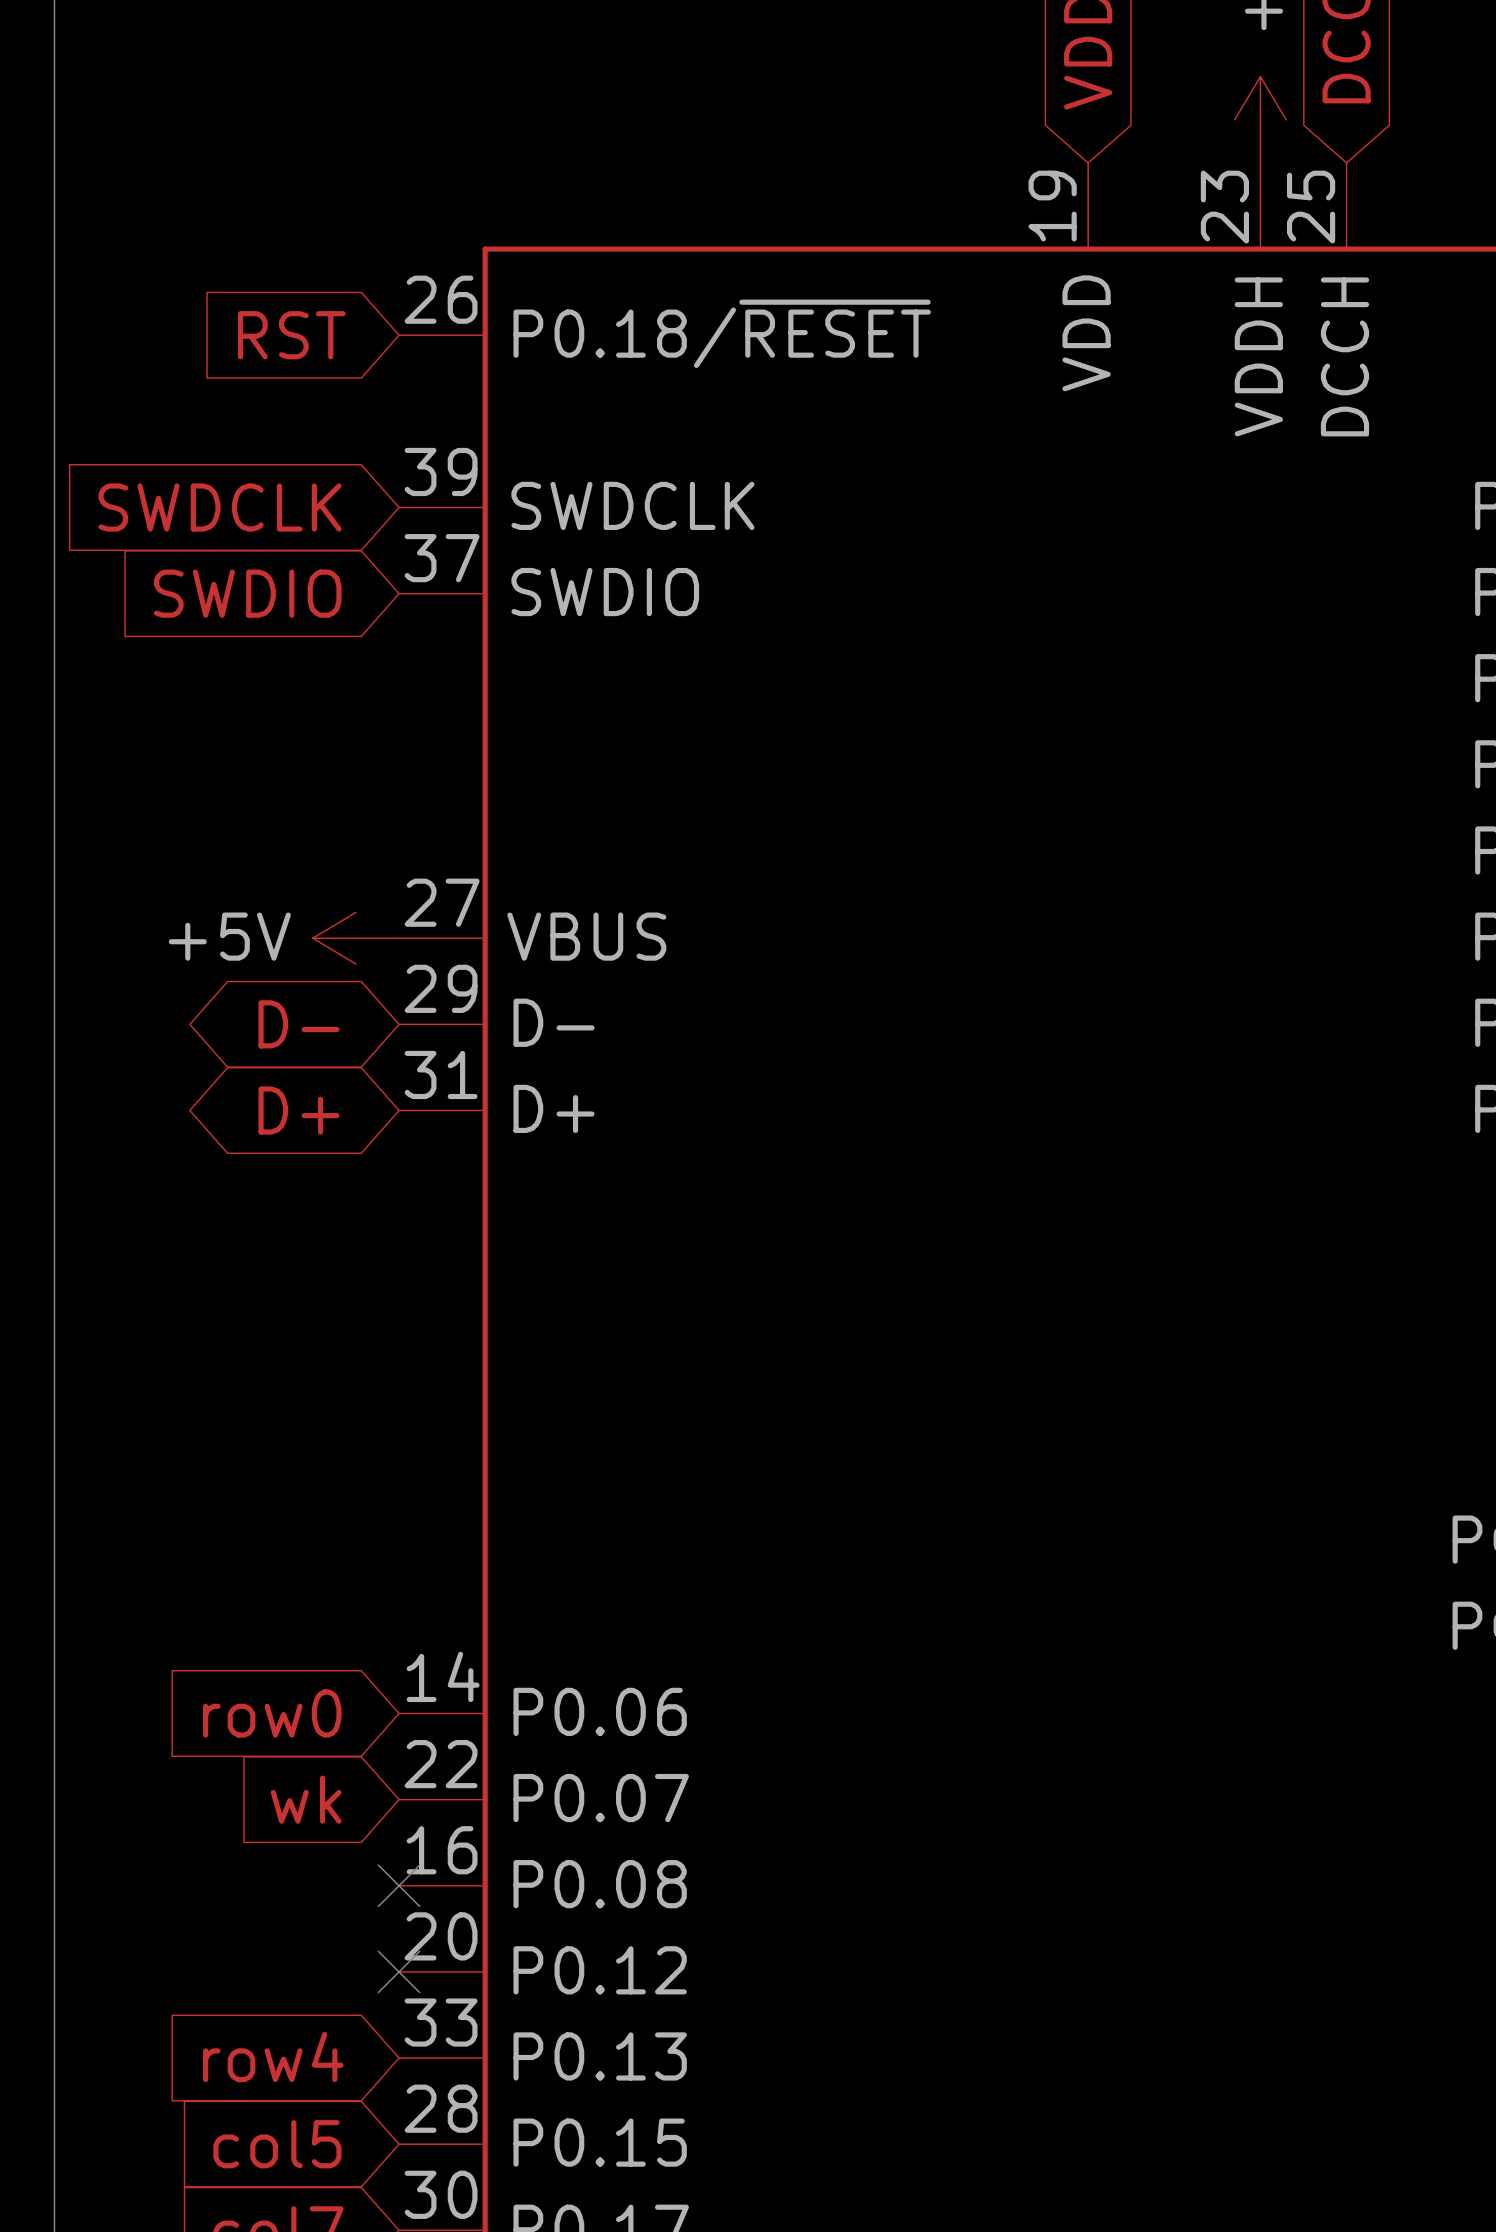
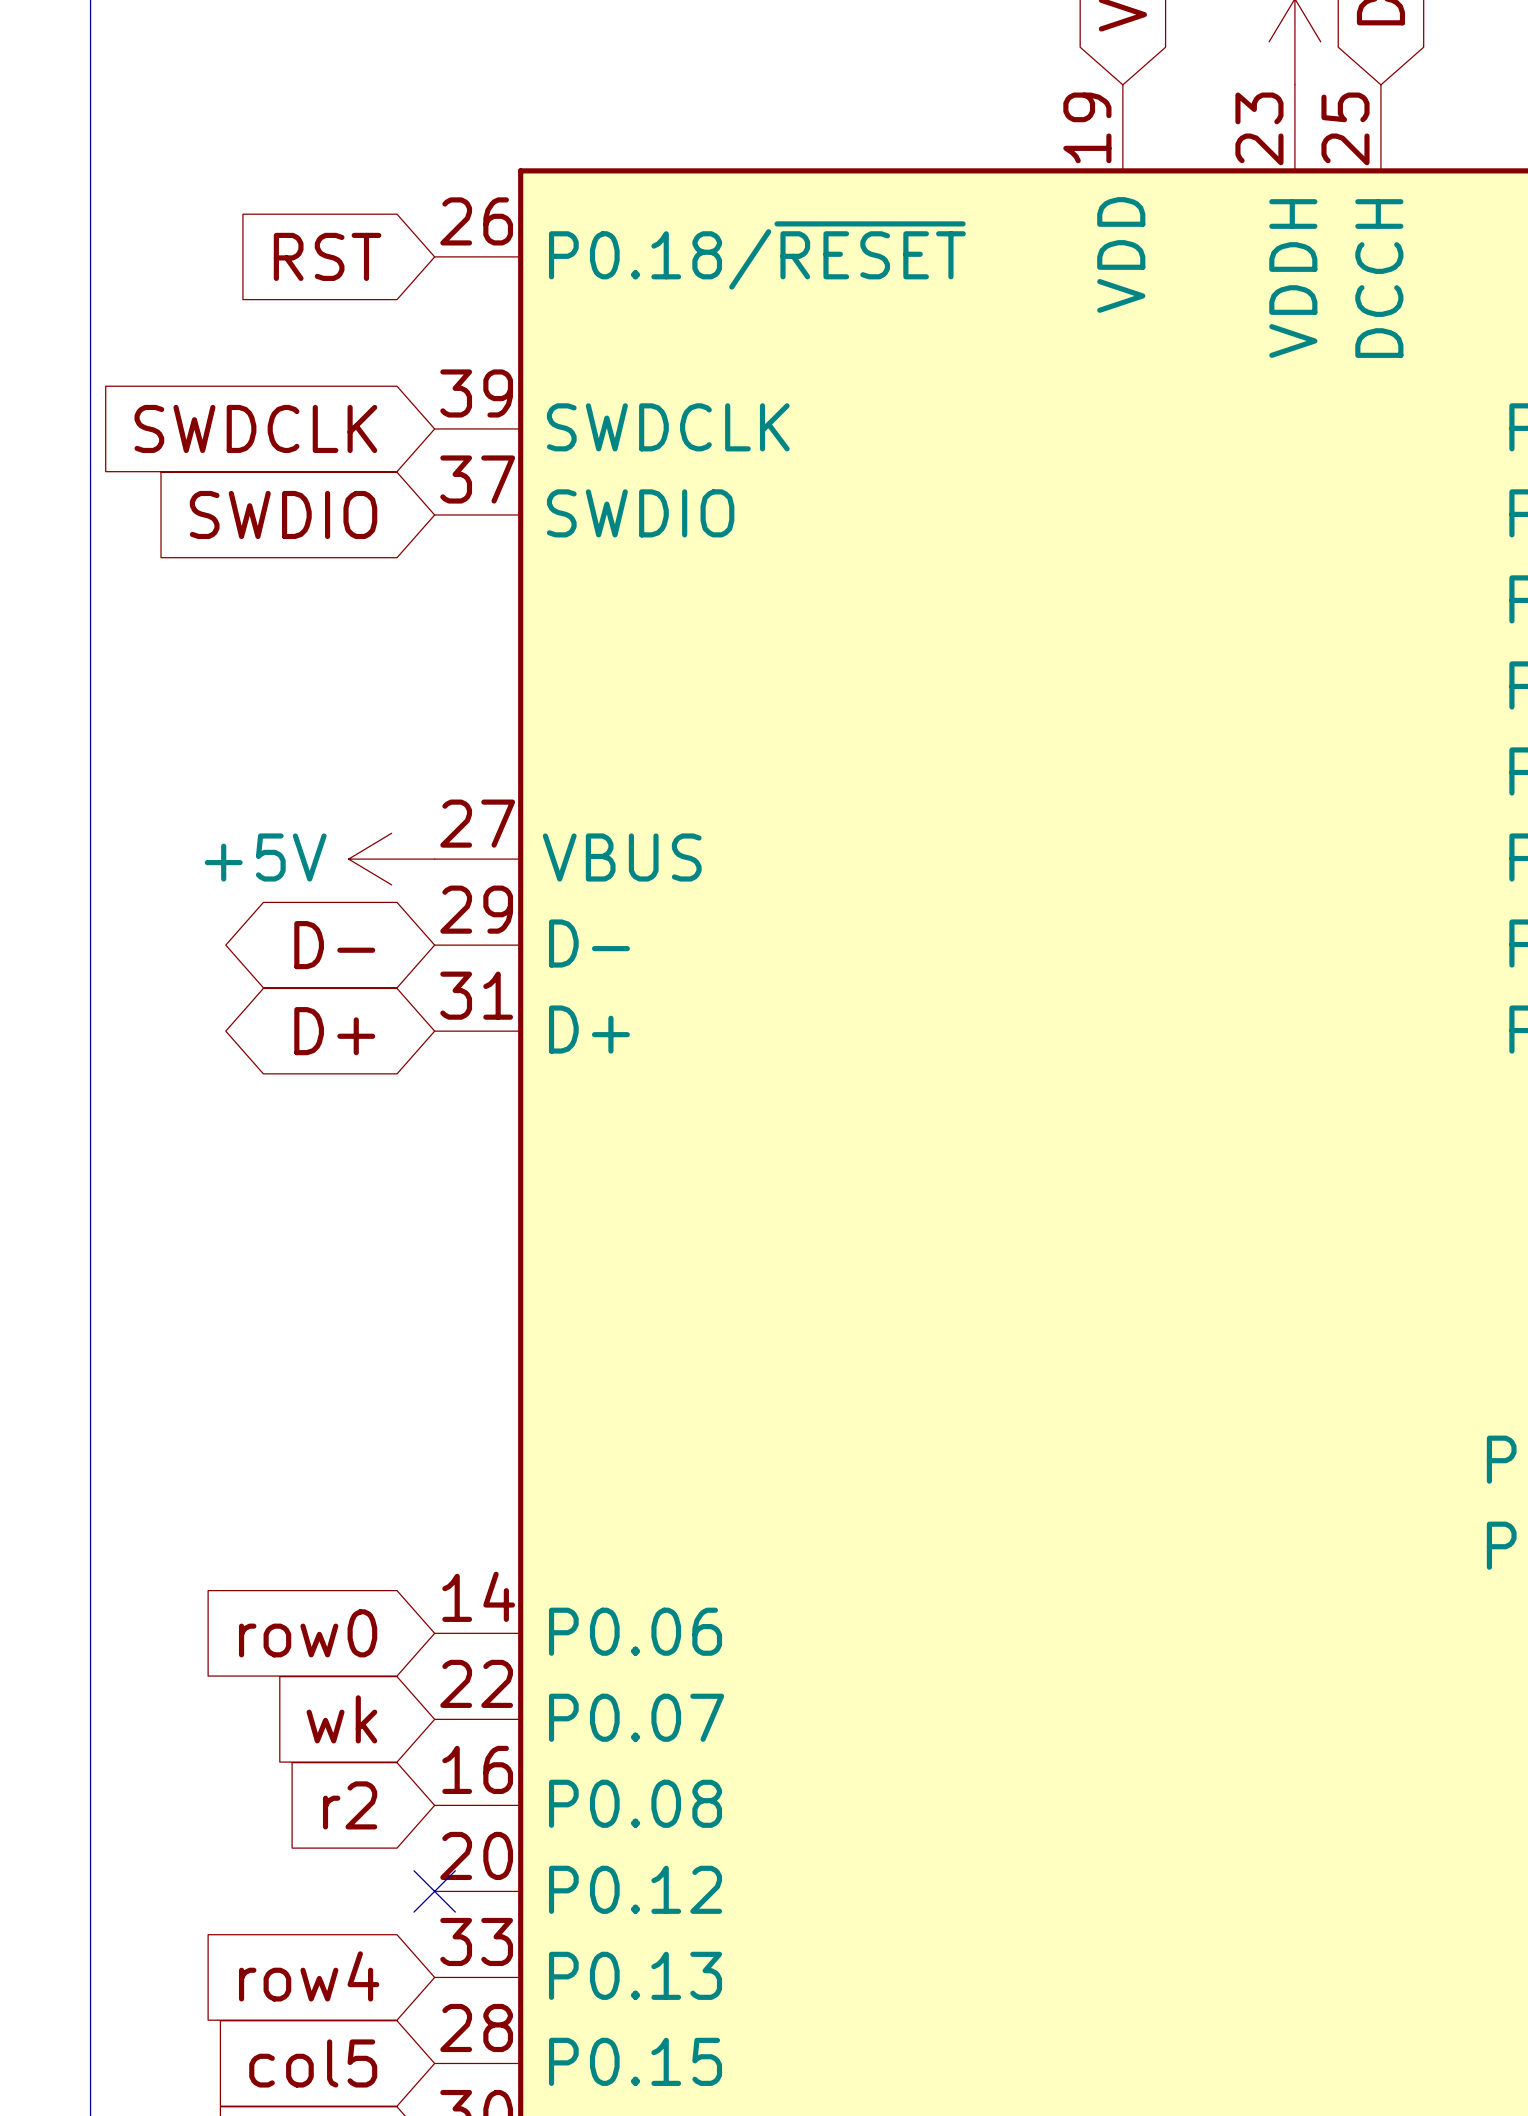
global label: none -> r2 (350, 1805)
no-connect mark: (399, 1885) -> none

